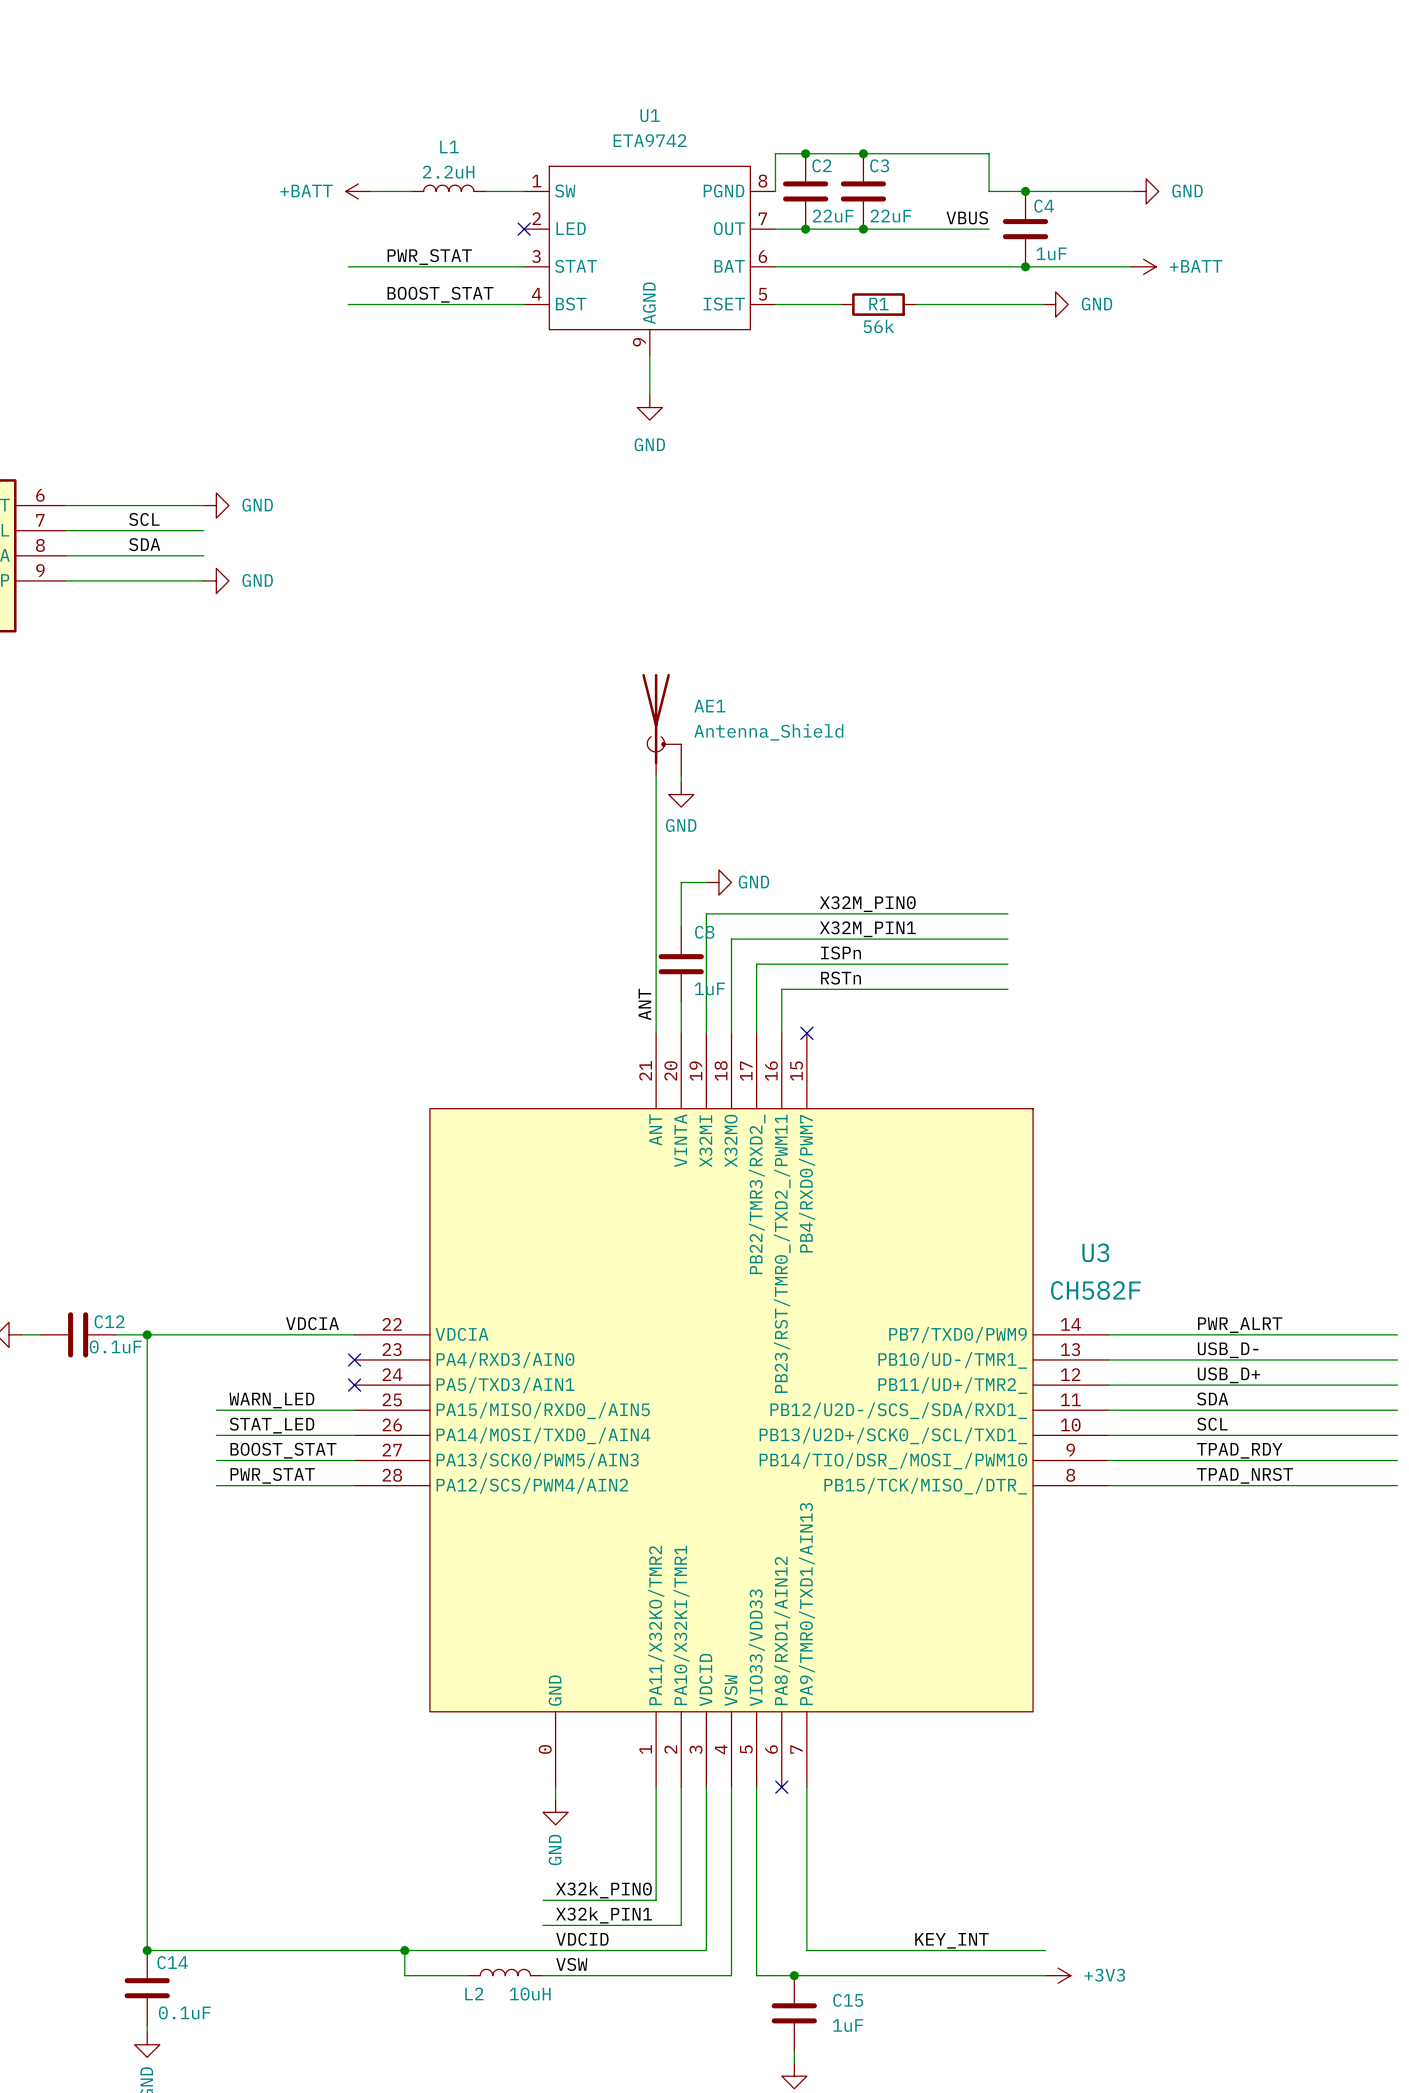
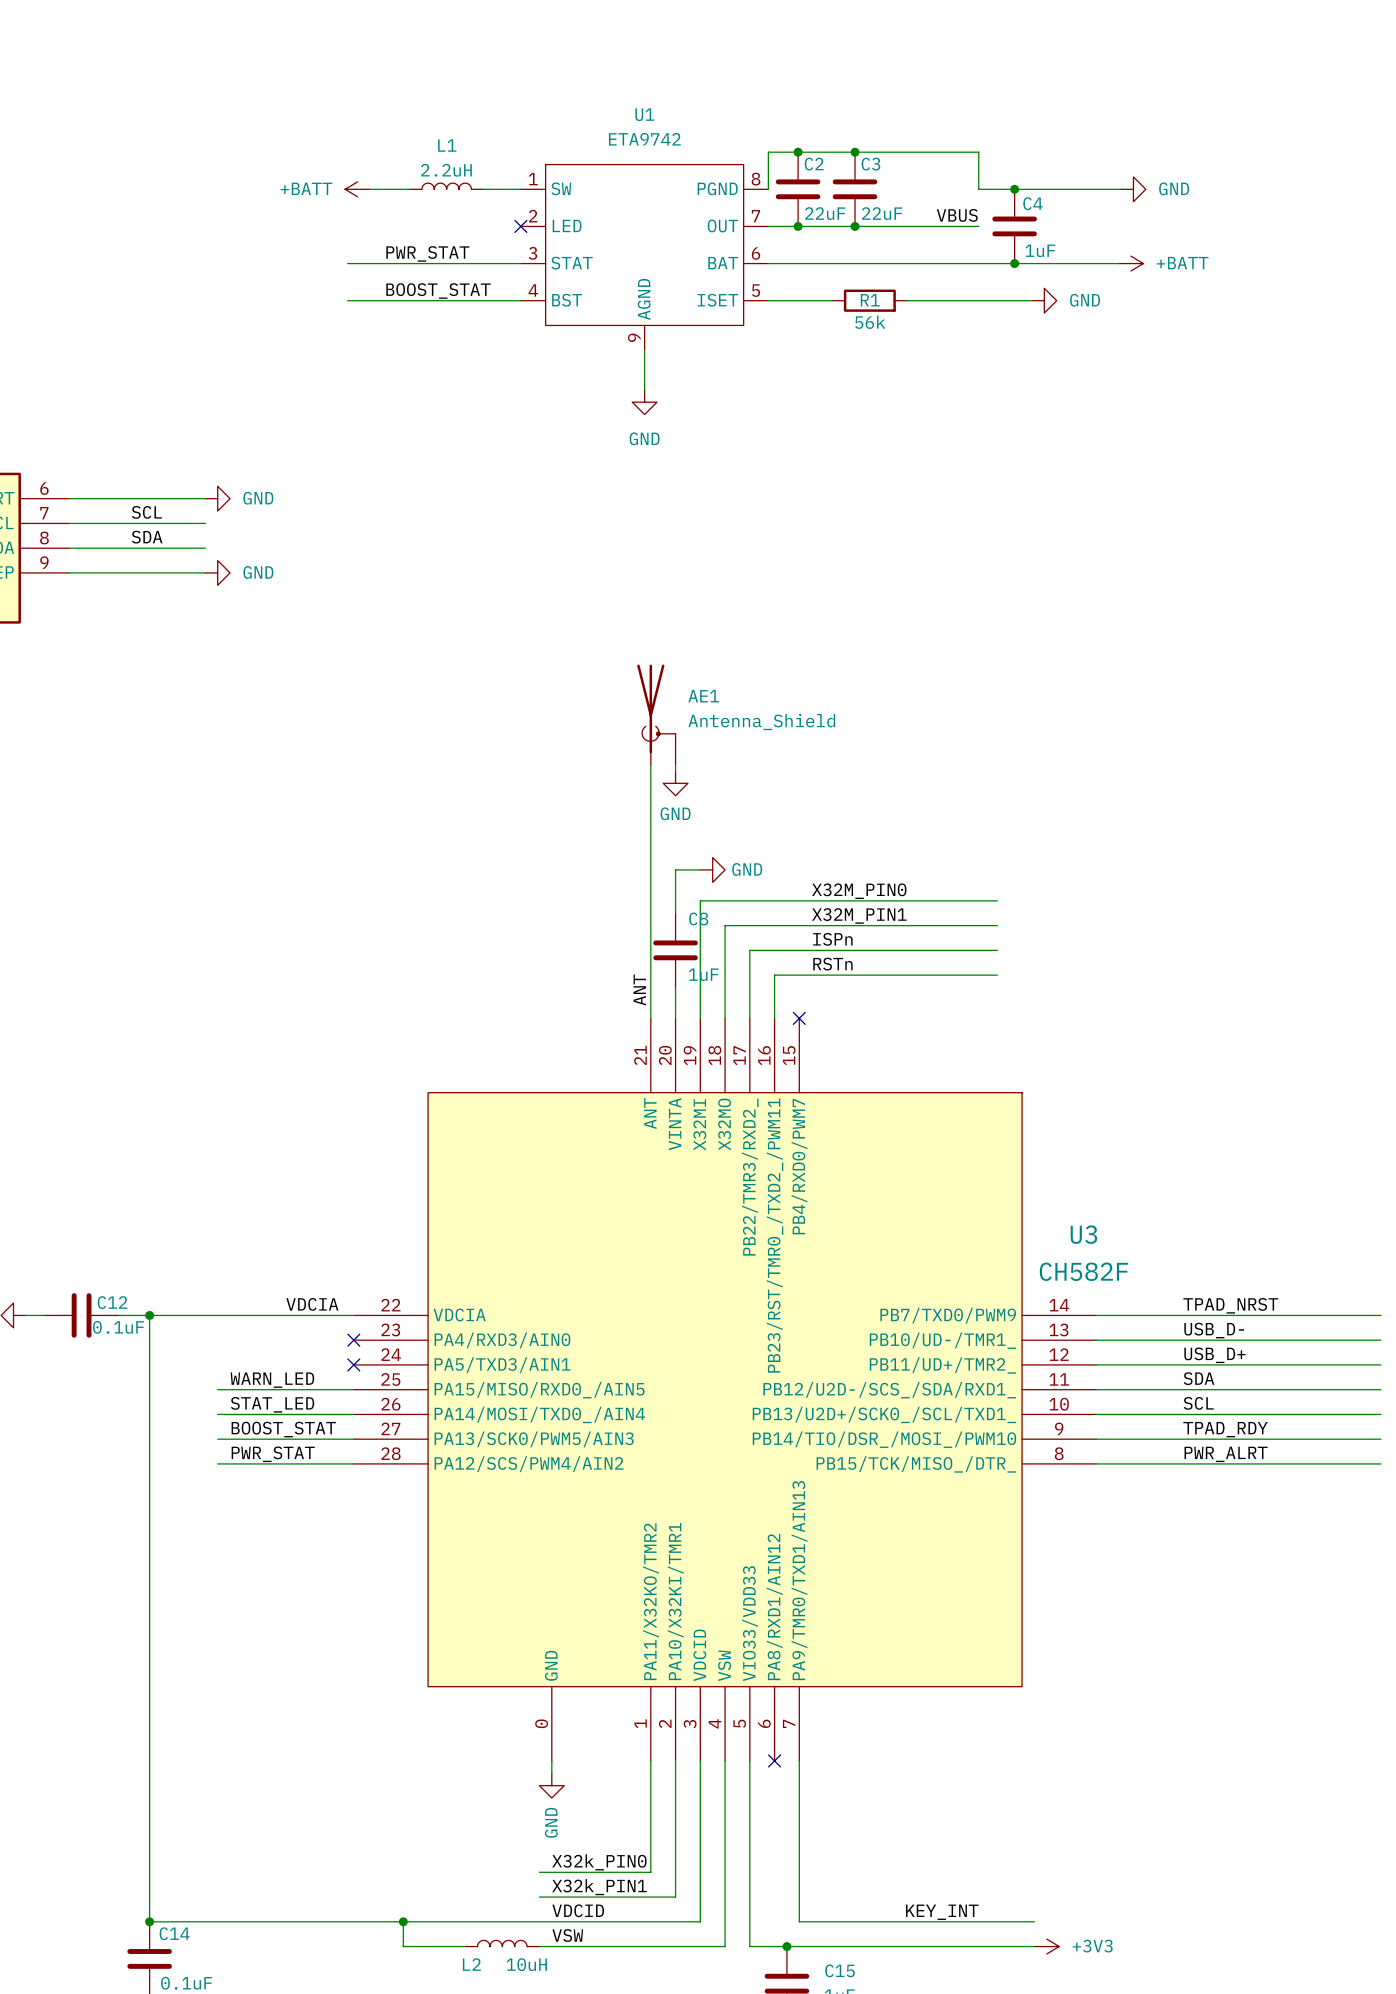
label: PWR_ALRT (1240, 1325) -> TPAD_NRST (1230, 1305)
label: TPAD_NRST (1245, 1475) -> PWR_ALRT (1226, 1454)

